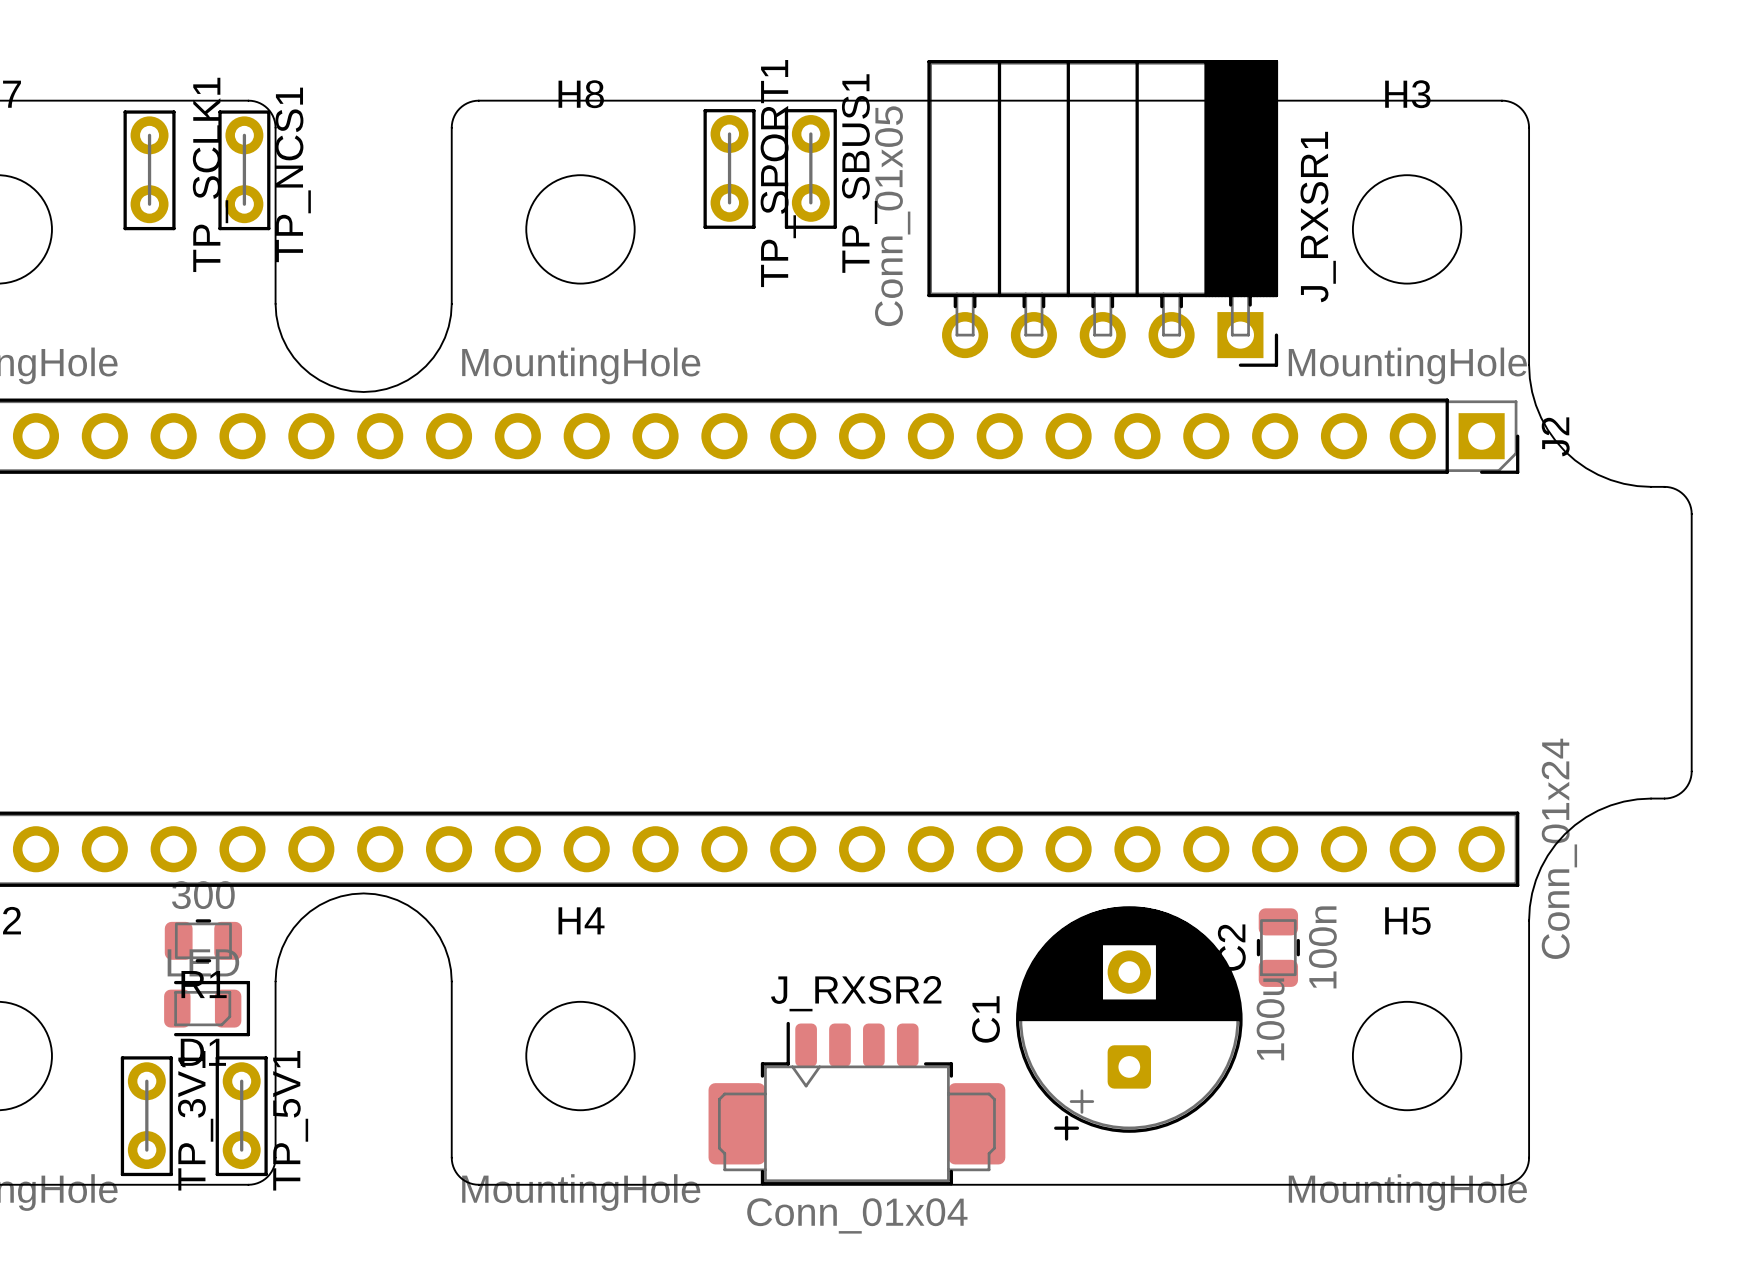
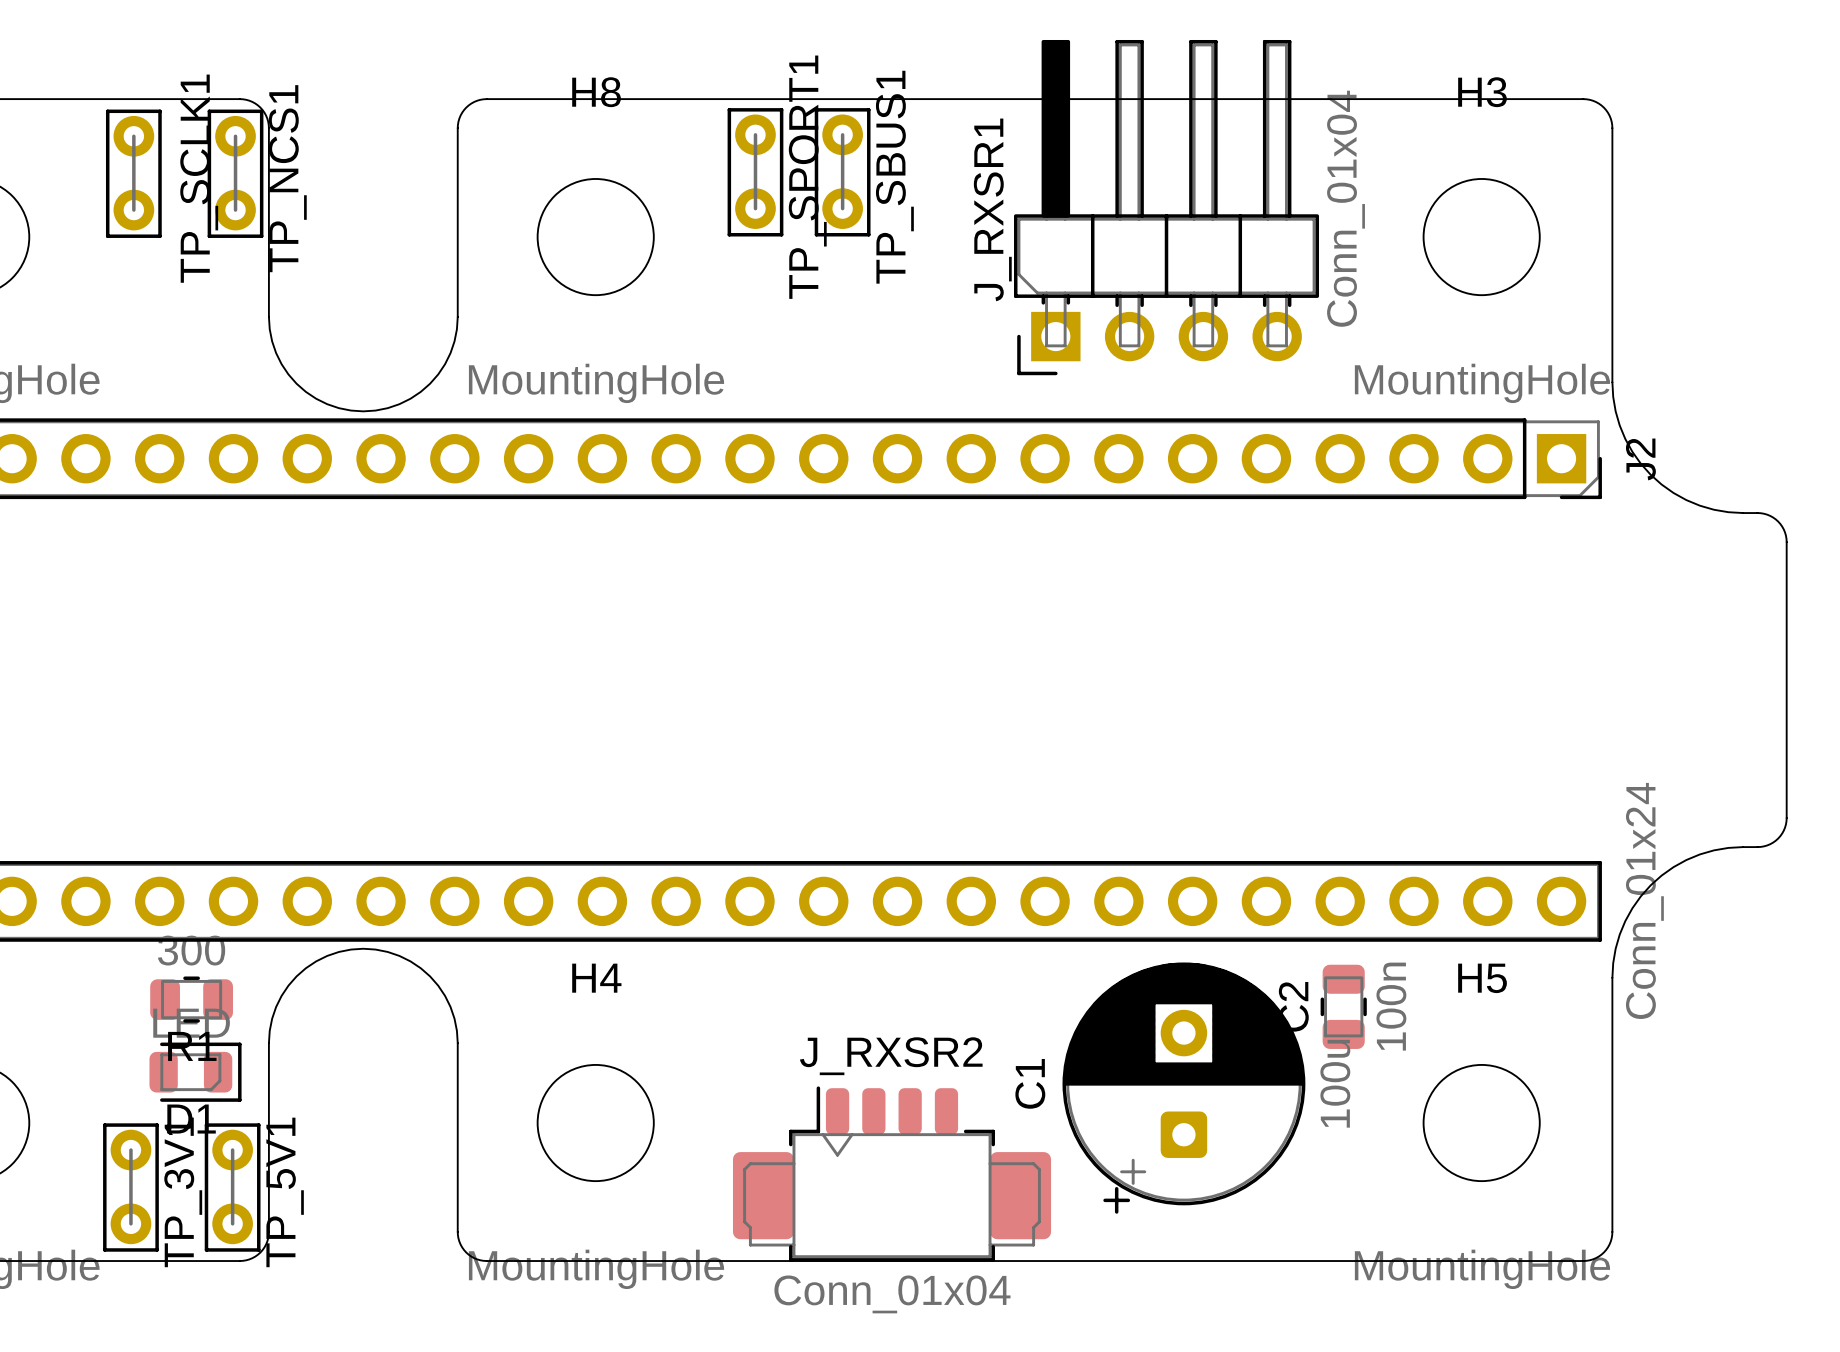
J_RXSR1 footprint: [927, 60, 1279, 367] -> [1014, 39, 1320, 376]
J_RXSR1 value: Conn_01x05 (892, 216) -> Conn_01x04 (1346, 208)
J_RXSR1 name position: J_RXSR1 (1318, 217) -> J_RXSR1 (992, 209)

